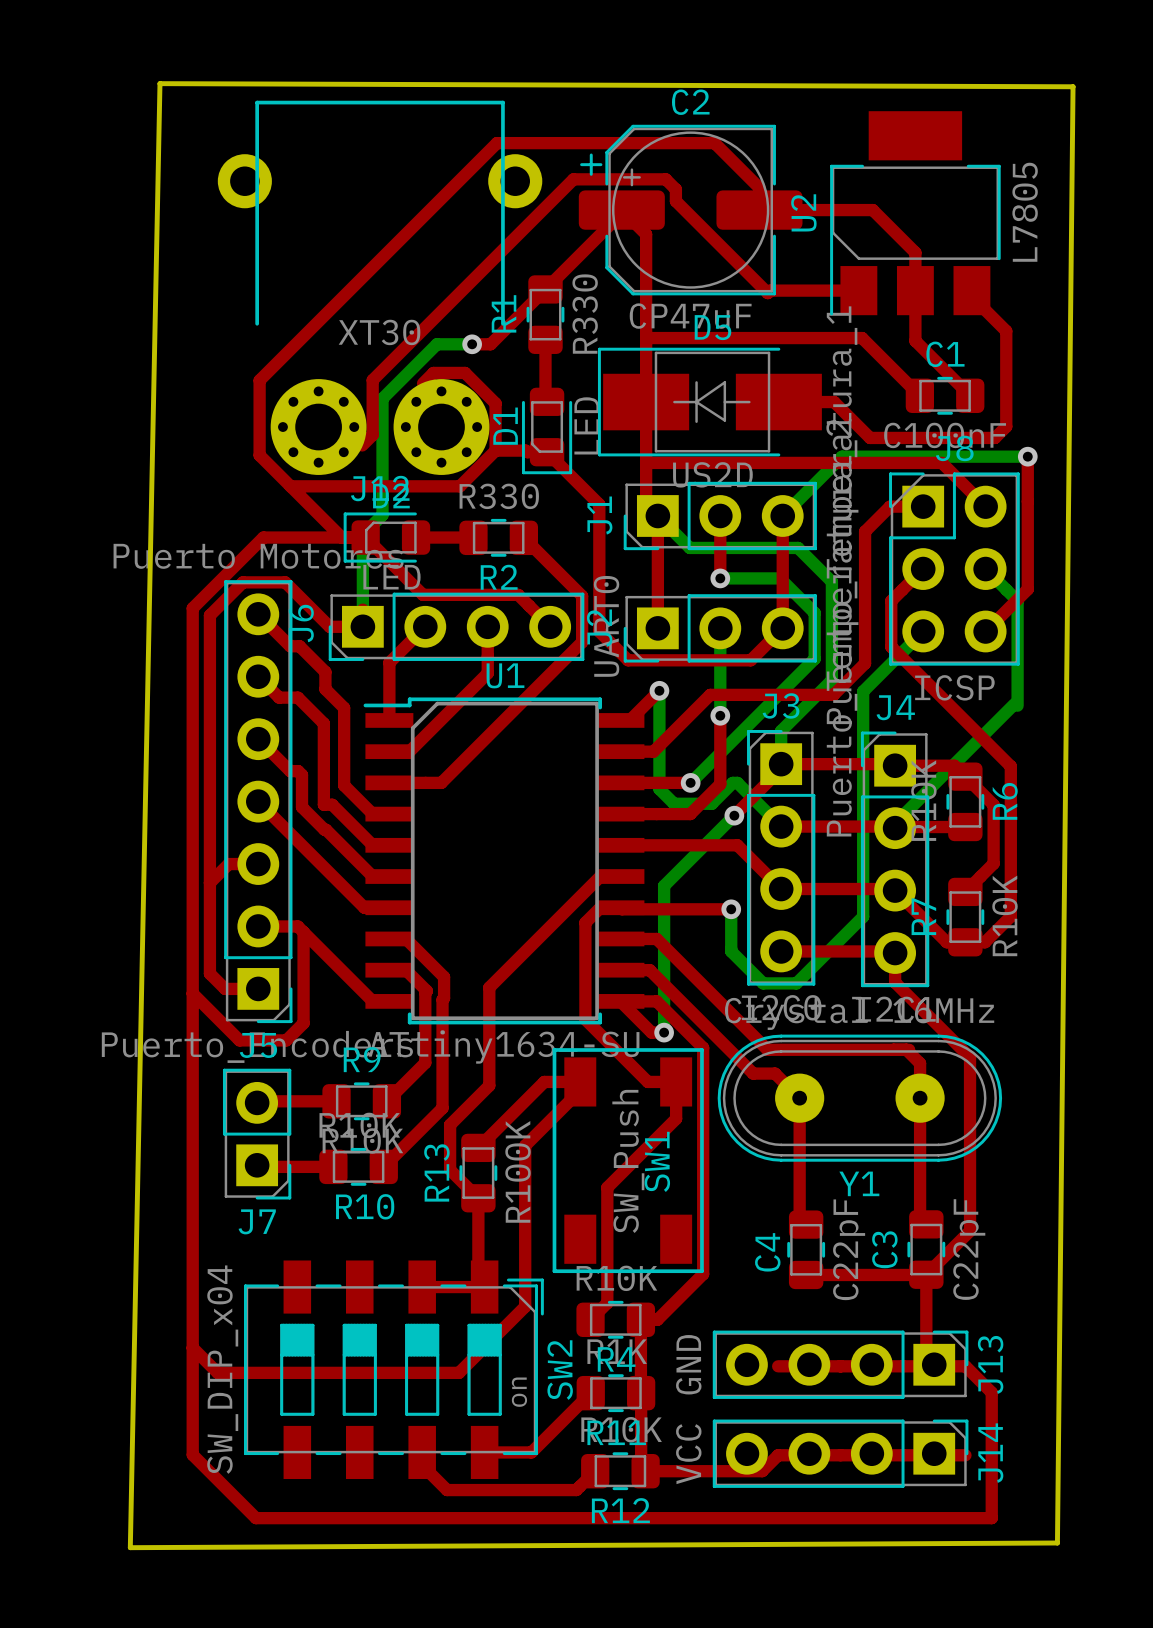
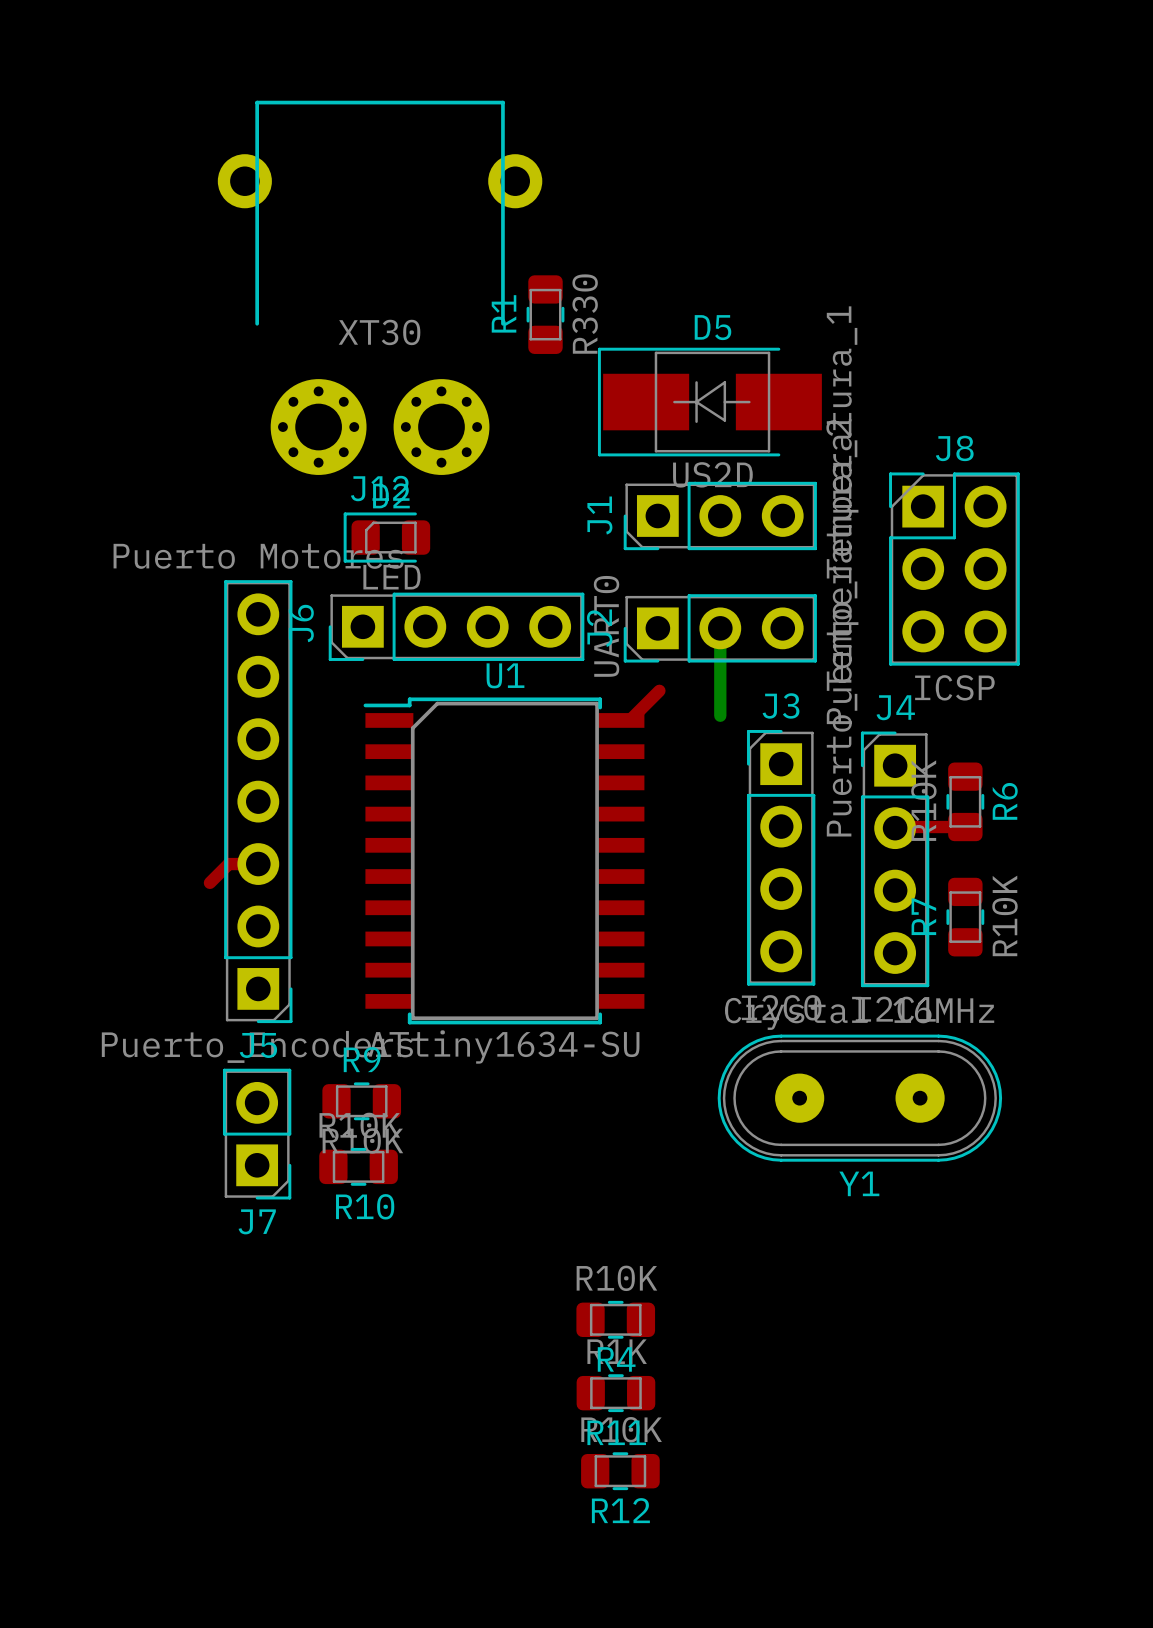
board edge: (159, 83) (130, 1547) (1057, 1542) (1073, 86) (159, 83) -> none
C2: CP47uF (690, 210) -> none
U2: L7805 (915, 213) -> none
top track: (858, 290) (770, 290) (767, 293) (675, 201) (675, 189) (665, 179) (573, 179) (372, 380) (372, 435) (362, 445) -> none
top track: (971, 290) (971, 296) (1006, 331) (1006, 426) (995, 437) (870, 437) (834, 402) (778, 402) -> none
top track: (646, 338) (862, 338) (919, 395) -> none
top track: (545, 339) (545, 400) (547, 401) -> none
top track: (472, 344) (490, 344) (621, 213) (621, 210) (646, 234) (646, 504) (657, 515) (657, 628) -> none
bottom track: (472, 344) (436, 344) (382, 398) (382, 515) (362, 534) (362, 626) -> none
via: (472, 344) -> none
top track: (423, 383) (433, 372) (465, 372) (495, 403) (495, 450) -> none
C1: C100nF (945, 395) -> none
top track: (970, 395) (915, 340) (915, 252) (872, 210) (759, 210) (759, 187) (714, 143) (496, 143) (259, 380) (259, 455) (341, 537) -> none
D1: LED (547, 430) -> none
top track: (495, 450) (459, 486) (290, 486) -> none
top track: (495, 450) (547, 452) (599, 504) (599, 631) (628, 660) (750, 660) (782, 628) (782, 515) -> none
top track: (1027, 456) (1027, 589) (985, 631) -> none
bottom track: (1027, 456) (842, 456) (782, 515) -> none
via: (1027, 456) -> none
top track: (646, 462) (941, 462) (985, 506) -> none
top track: (923, 506) (890, 506) (865, 531) (865, 663) (833, 694) (710, 694) (653, 751) (620, 751) -> none
bottom track: (657, 515) (689, 547) (798, 547) (831, 581) (831, 680) (781, 730) (781, 764) -> none
top track: (720, 515) (720, 578) -> none
top track: (416, 537) (473, 537) -> none
R2: R330 (498, 537) -> none
top track: (523, 537) (582, 596) (582, 642) (441, 782) (389, 782) -> none
top track: (923, 569) (891, 601) (891, 646) (1010, 766) (1010, 916) (985, 942) (946, 942) (893, 889) (781, 889) (737, 845) (620, 845) -> none
bottom track: (985, 569) (1017, 601) (1017, 705) -> none
bottom track: (720, 578) (780, 578) (814, 613) (814, 658) (690, 782) -> none
via: (720, 578) -> none
top track: (362, 609) (362, 626) (329, 626) (285, 582) (242, 582) (209, 615) (209, 973) (225, 988) (258, 988) -> none
top track: (258, 614) (290, 646) (299, 646) (325, 672) (325, 689) (344, 707) (344, 785) (372, 814) (389, 814) -> none
top track: (425, 626) (389, 662) (389, 720) -> none
top track: (487, 626) (487, 673) (409, 751) (389, 751) -> none
top track: (550, 626) (518, 594) (422, 594) (365, 537) (263, 537) (192, 608) (192, 1454) (255, 1518) (991, 1518) (991, 1392) (965, 1366) (778, 1366) -> none
bottom track: (923, 631) (863, 691) (863, 916) (796, 983) (763, 983) (731, 951) (731, 909) -> none
top track: (258, 676) (279, 697) (297, 697) (323, 723) (323, 804) (332, 804) (372, 845) (389, 845) -> none
bottom track: (659, 690) (659, 789) (674, 803) (711, 803) (732, 782) (737, 782) (781, 826) -> none
via: (659, 690) -> none
bottom track: (1014, 704) (891, 826) -> none
top track: (720, 715) (720, 784) (690, 814) (620, 814) -> none
via: (720, 715) -> none
top track: (258, 739) (290, 771) (298, 771) (302, 774) (302, 807) (372, 876) (389, 876) -> none
top track: (620, 782) (690, 782) -> none
via: (690, 782) -> none
top track: (258, 801) (364, 907) (389, 907) -> none
top track: (734, 815) (781, 768) (781, 764) (954, 765) (993, 804) (993, 863) (965, 891) -> none
bottom track: (734, 815) (664, 885) (664, 1032) -> none
via: (734, 815) -> none
top track: (902, 820) (895, 828) (893, 826) (781, 826) -> none
top track: (620, 876) (600, 876) (489, 987) (489, 1085) (450, 1124) (450, 1170) (478, 1198) (478, 1280) (484, 1287) (422, 1287) -> none
top track: (731, 909) (600, 907) (585, 922) (585, 1019) (647, 1081) (676, 1081) (676, 1118) (607, 1187) (607, 1303) (590, 1319) -> none
via: (731, 909) -> none
top track: (258, 926) (297, 926) (372, 1001) (389, 1001) -> none
top track: (303, 932) (303, 1023) (286, 1040) (239, 1040) (192, 993) -> none
top track: (389, 938) (405, 938) (444, 977) (442, 1108) (383, 1166) -> none
top track: (620, 938) (656, 938) (767, 1049) (909, 1049) -> none
top track: (781, 951) (893, 951) (895, 982) (970, 1057) (970, 1231) (926, 1274) (806, 1274) -> none
top track: (389, 970) (405, 970) (426, 991) (425, 992) (425, 1062) (386, 1101) -> none
top track: (620, 970) (649, 970) (753, 1073) (775, 1073) (799, 1098) (799, 1218) (806, 1224) -> none
top track: (664, 1032) (651, 1032) (620, 1001) (656, 1001) (703, 1047) (703, 1274) (657, 1319) (640, 1319) (640, 1392) -> none
via: (664, 1032) -> none
top track: (906, 1049) (920, 1063) (920, 1218) (926, 1224) -> none
top track: (336, 1101) (258, 1101) (257, 1102) -> none
top track: (478, 1147) (544, 1081) (580, 1081) (580, 1090) (525, 1145) (525, 1306) (459, 1372) (217, 1372) (192, 1347) -> none
SW1: SW_Push (628, 1160) -> none
top track: (257, 1165) (258, 1166) (333, 1166) -> none
R13: R100K (478, 1173) -> none
C4: C22pF (806, 1249) -> none
C3: C22pF (926, 1249) -> none
top track: (926, 1274) (926, 1356) (934, 1364) -> none
J13: GND (840, 1364) -> none
SW2: SW_DIP_x04 (393, 1369) -> none
top track: (590, 1393) (531, 1452) (484, 1452) -> none
top track: (641, 1393) (641, 1466) (645, 1471) (762, 1471) (778, 1455) (965, 1455) -> none
top track: (422, 1452) (422, 1465) (447, 1490) (576, 1490) (595, 1471) -> none
J14: VCC (840, 1453) -> none

